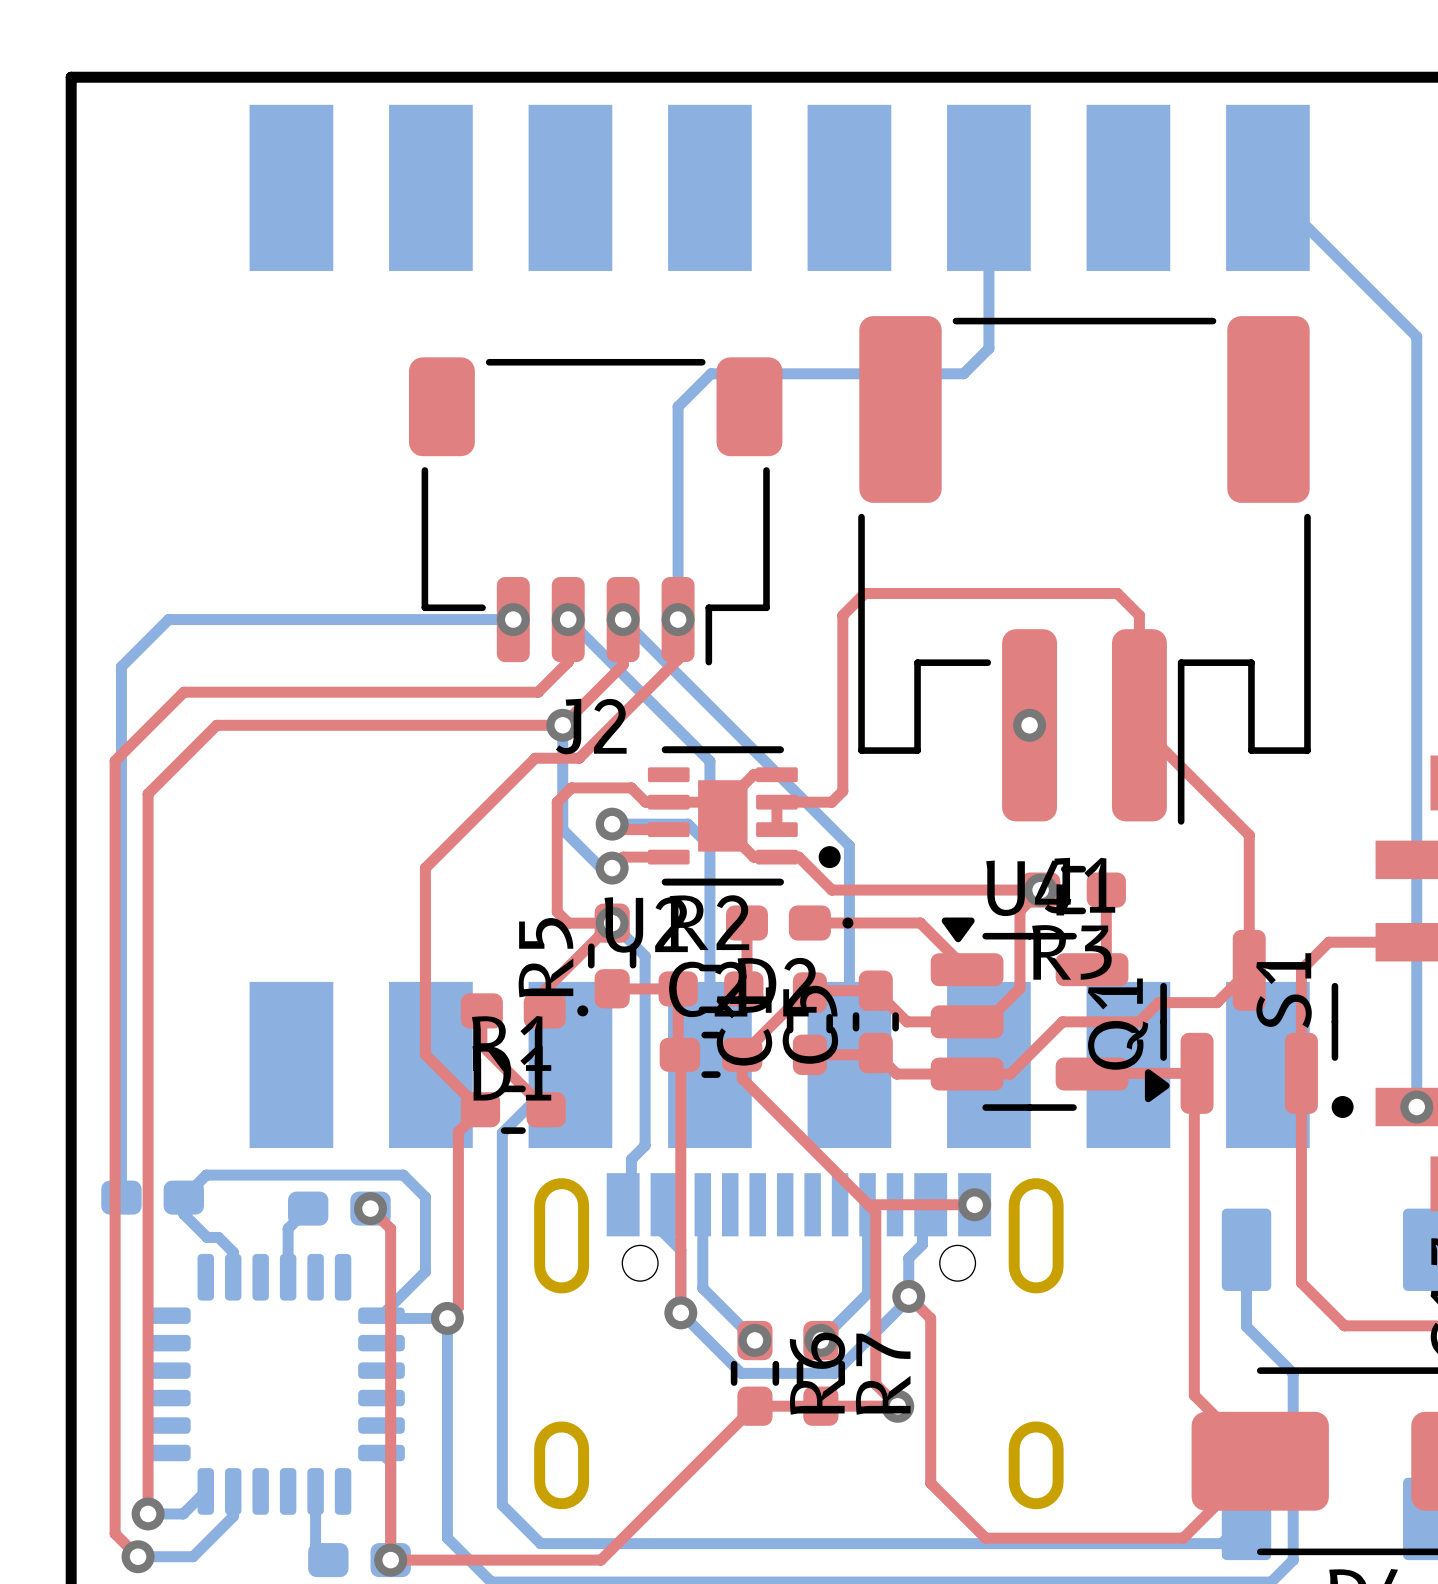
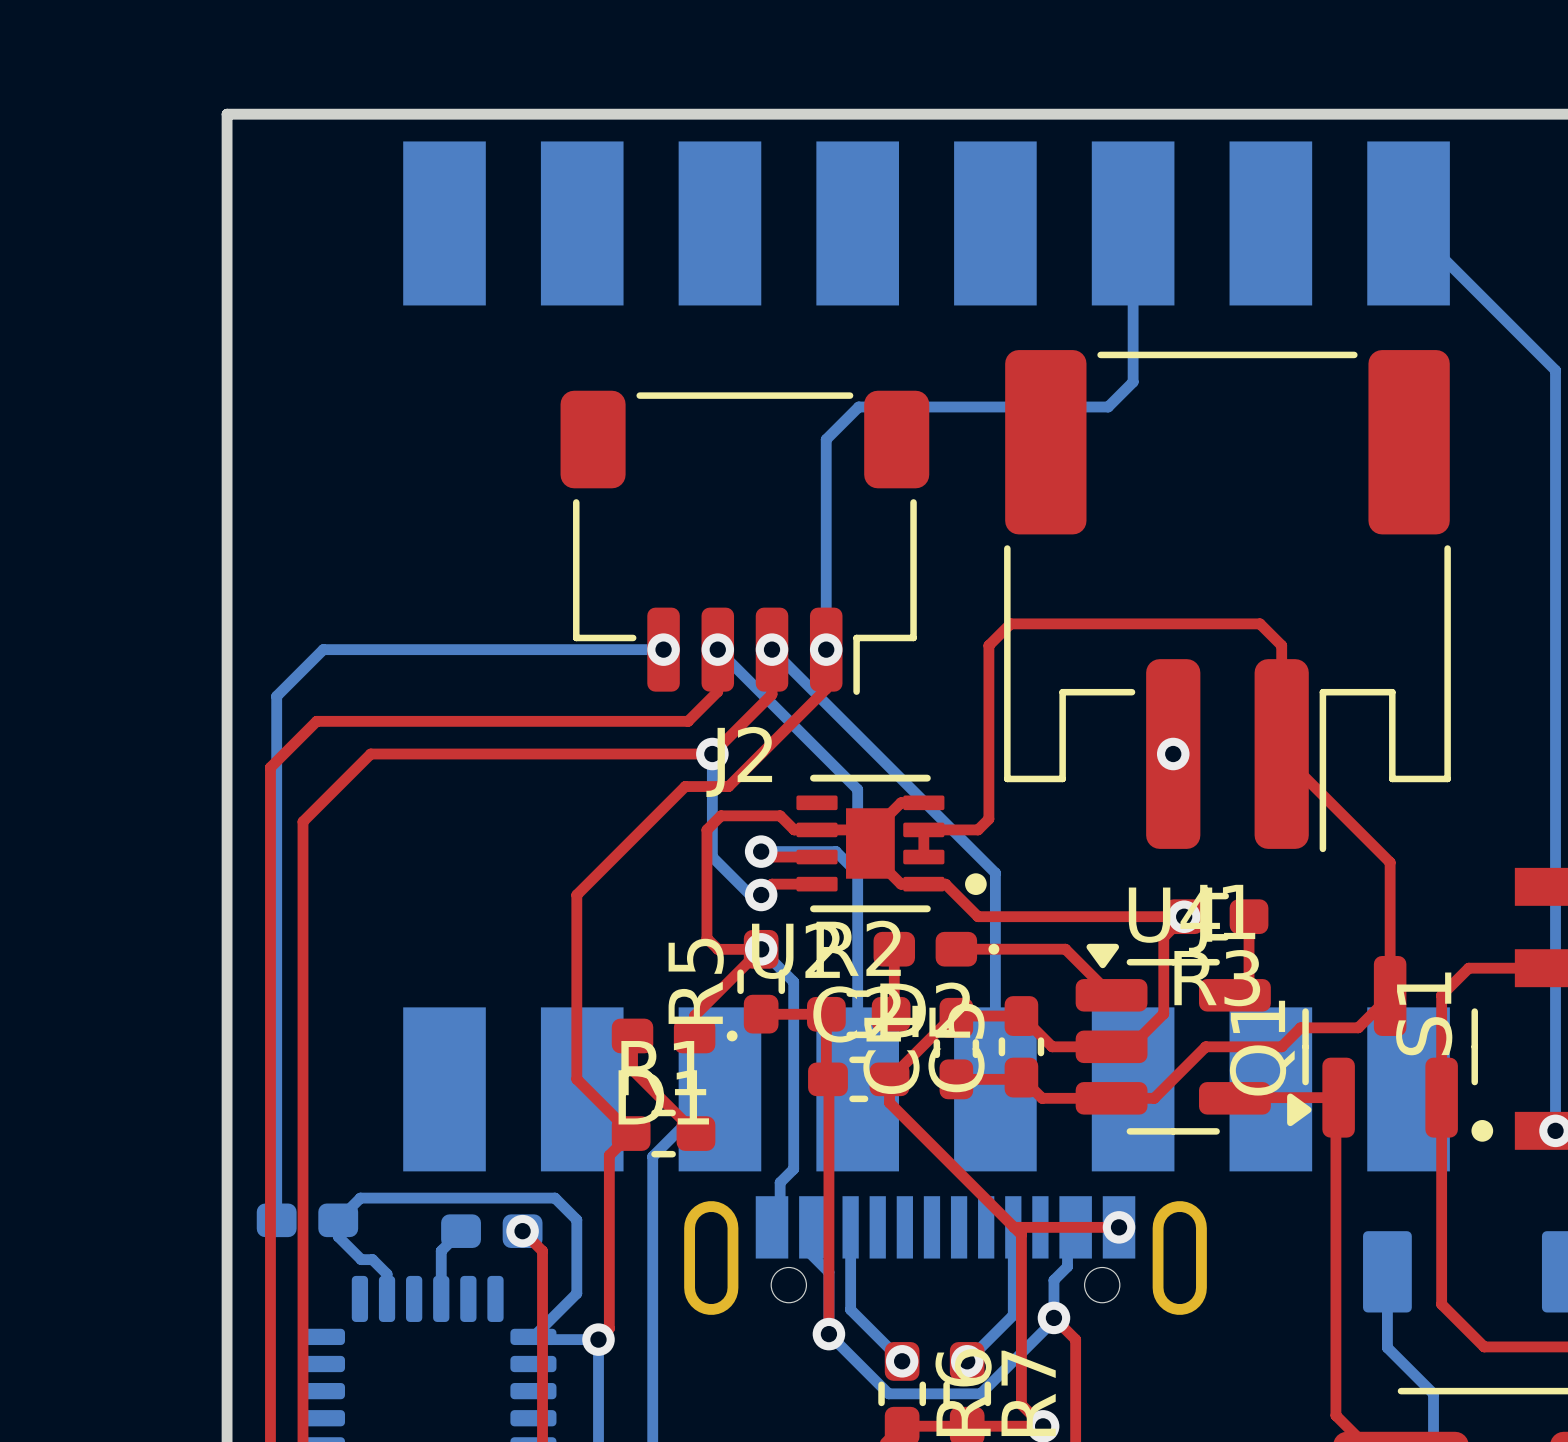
top track: (183, 692) (115, 760) -> (338, 721) (316, 721) (270, 767) (270, 789)

